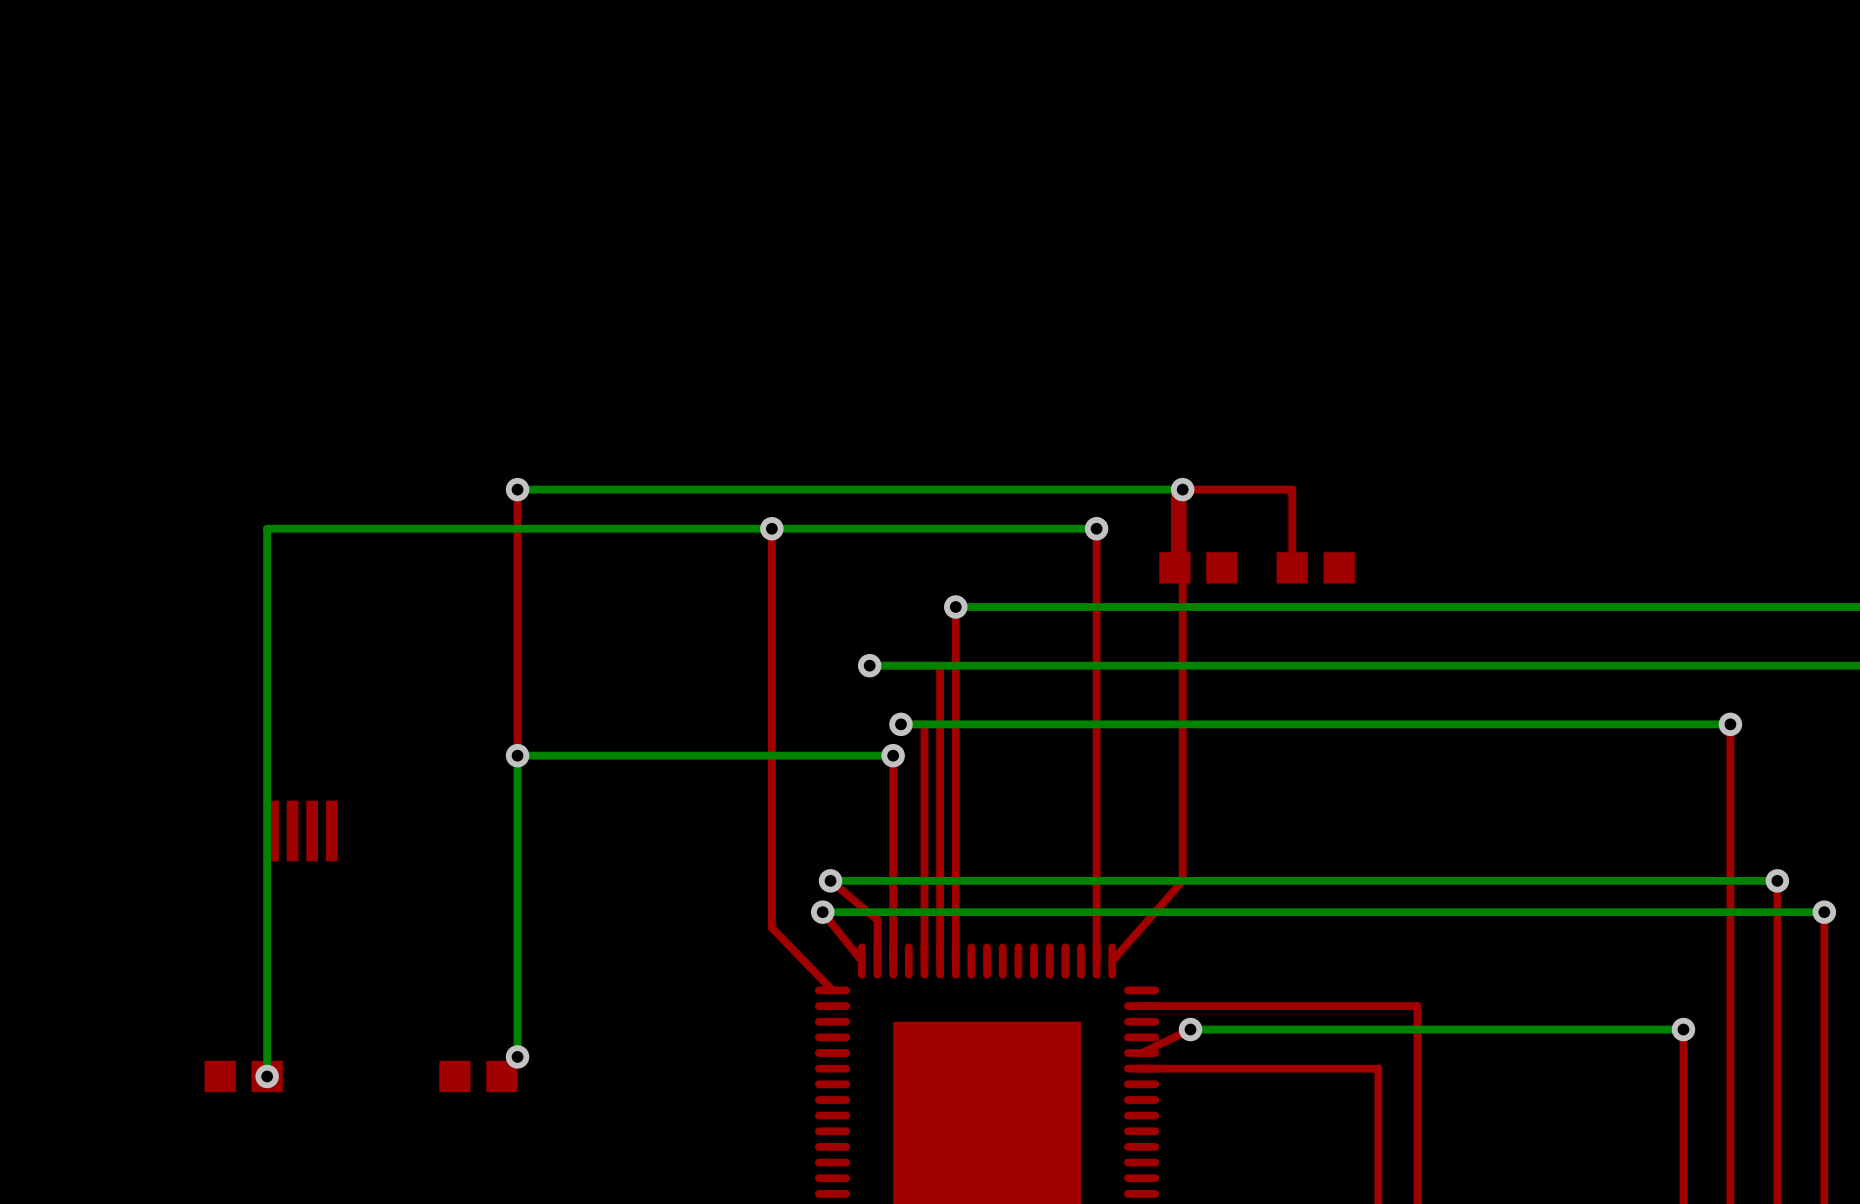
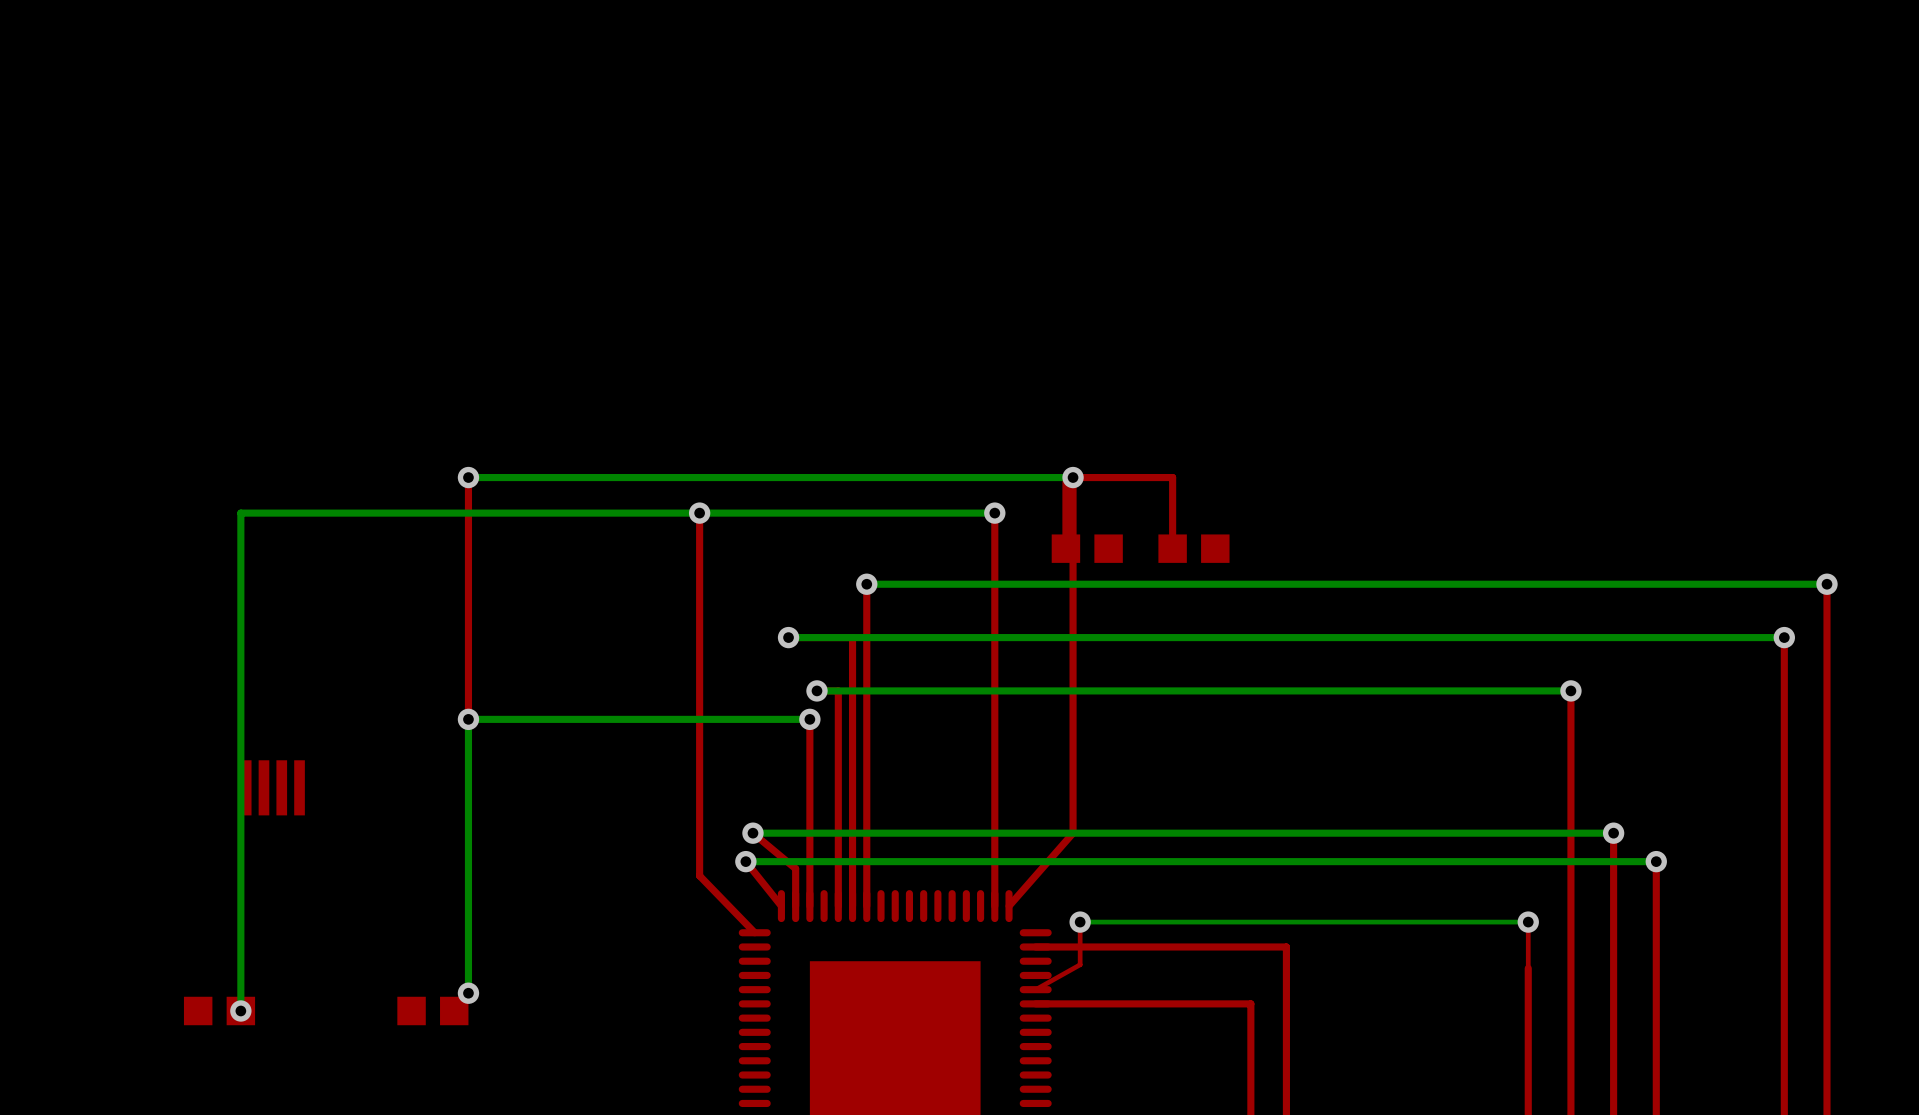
top track: none -> (1528, 922) (1528, 968)
top track: (1190, 1029) (1141, 1053) -> (1080, 922) (1080, 964) (1035, 989)
via position: (1190, 1029) -> (1080, 922)
bottom track: (1683, 1029) (1190, 1029) -> (1528, 922) (1080, 922)
via position: (1683, 1029) -> (1528, 922)

